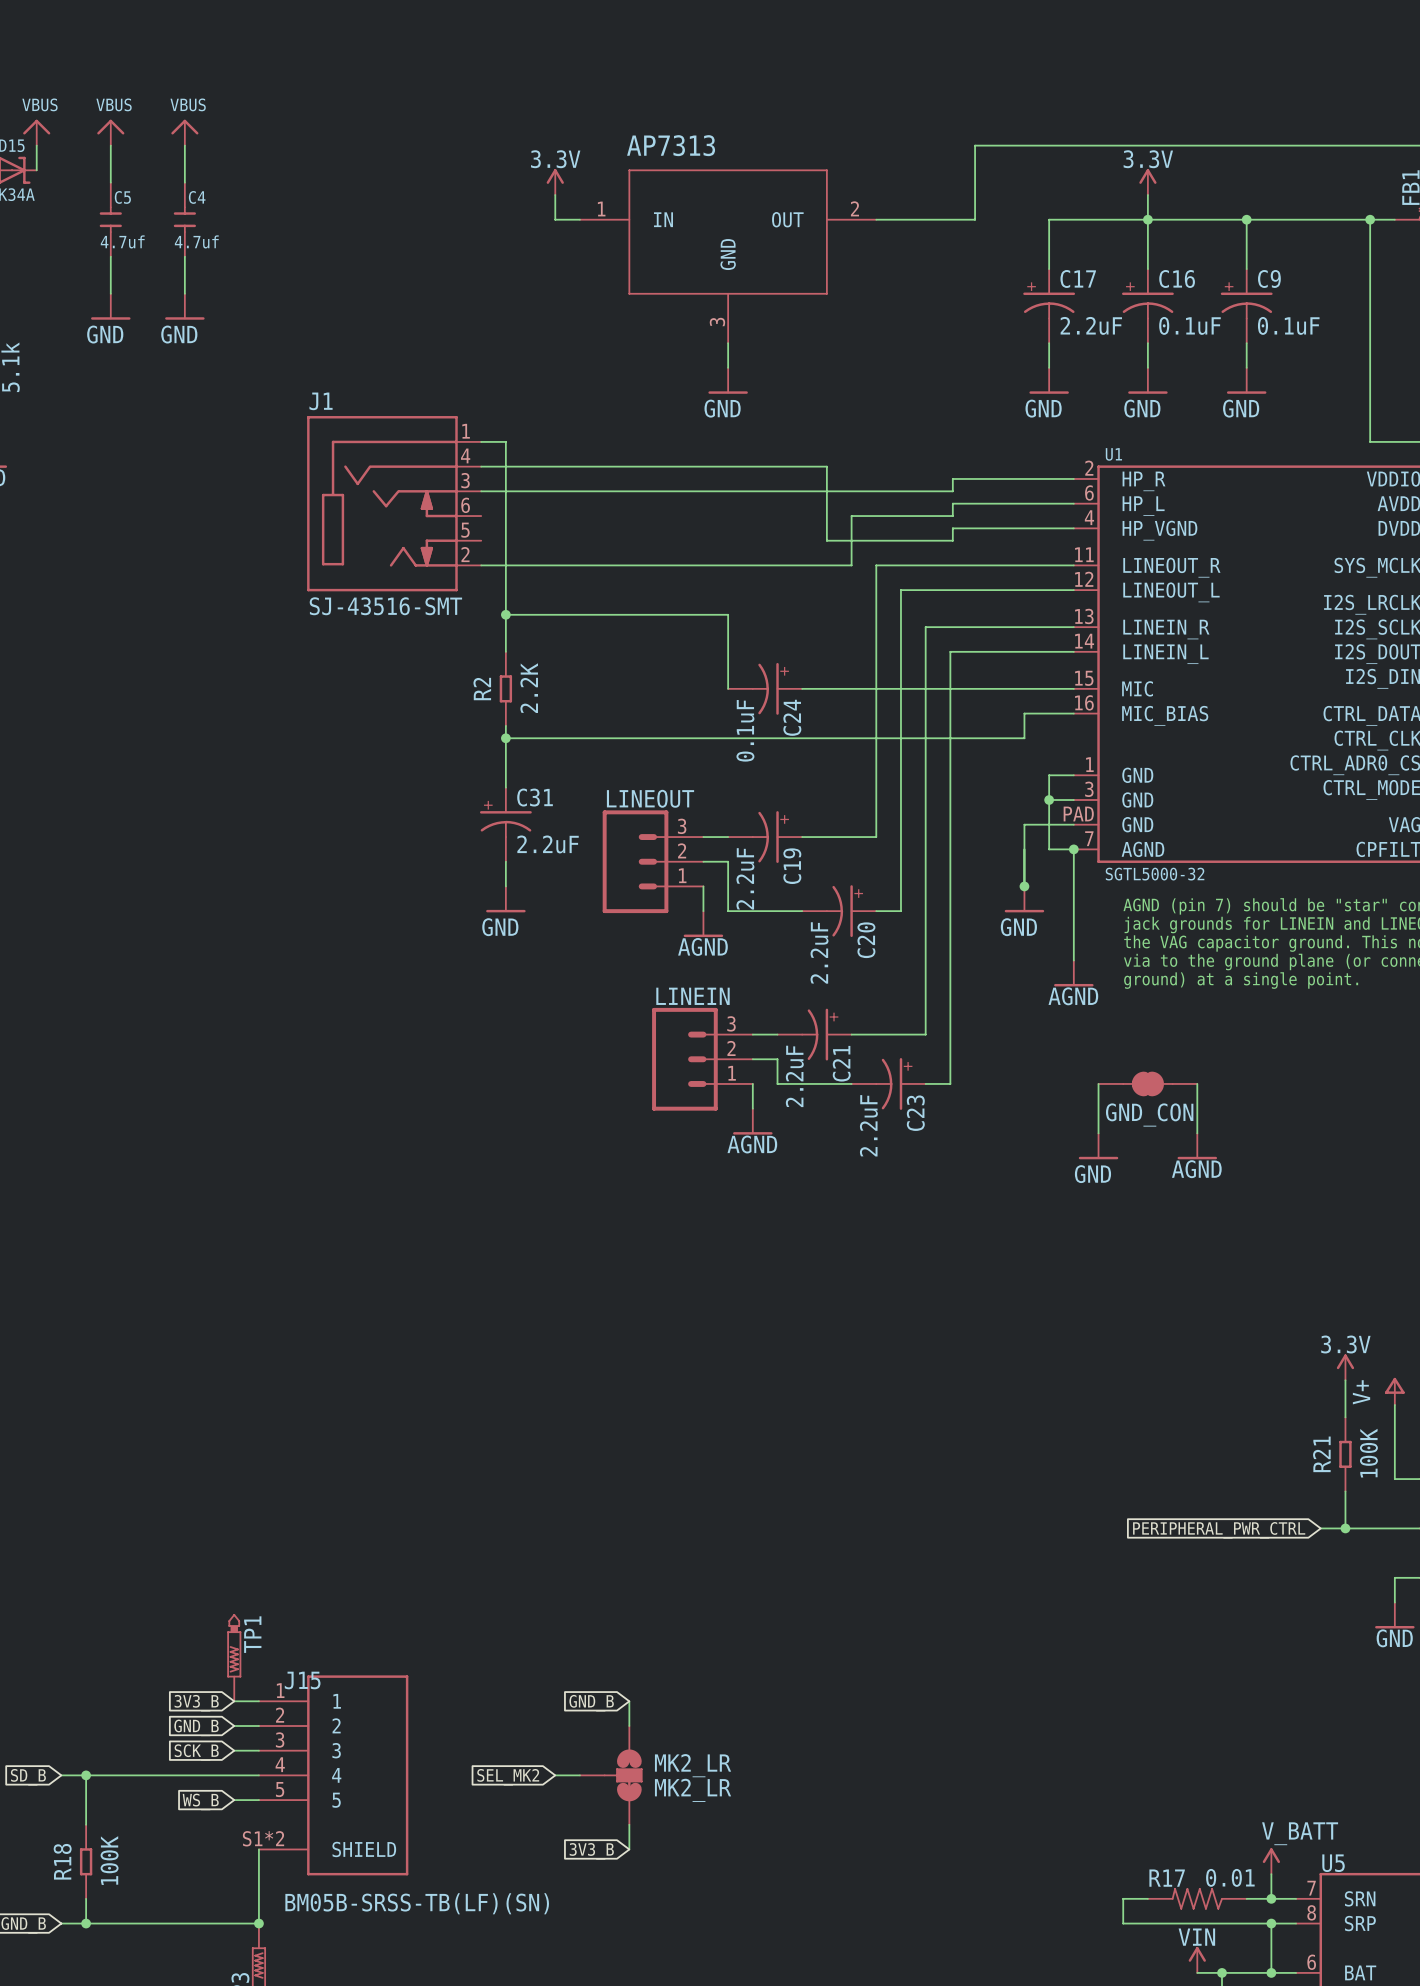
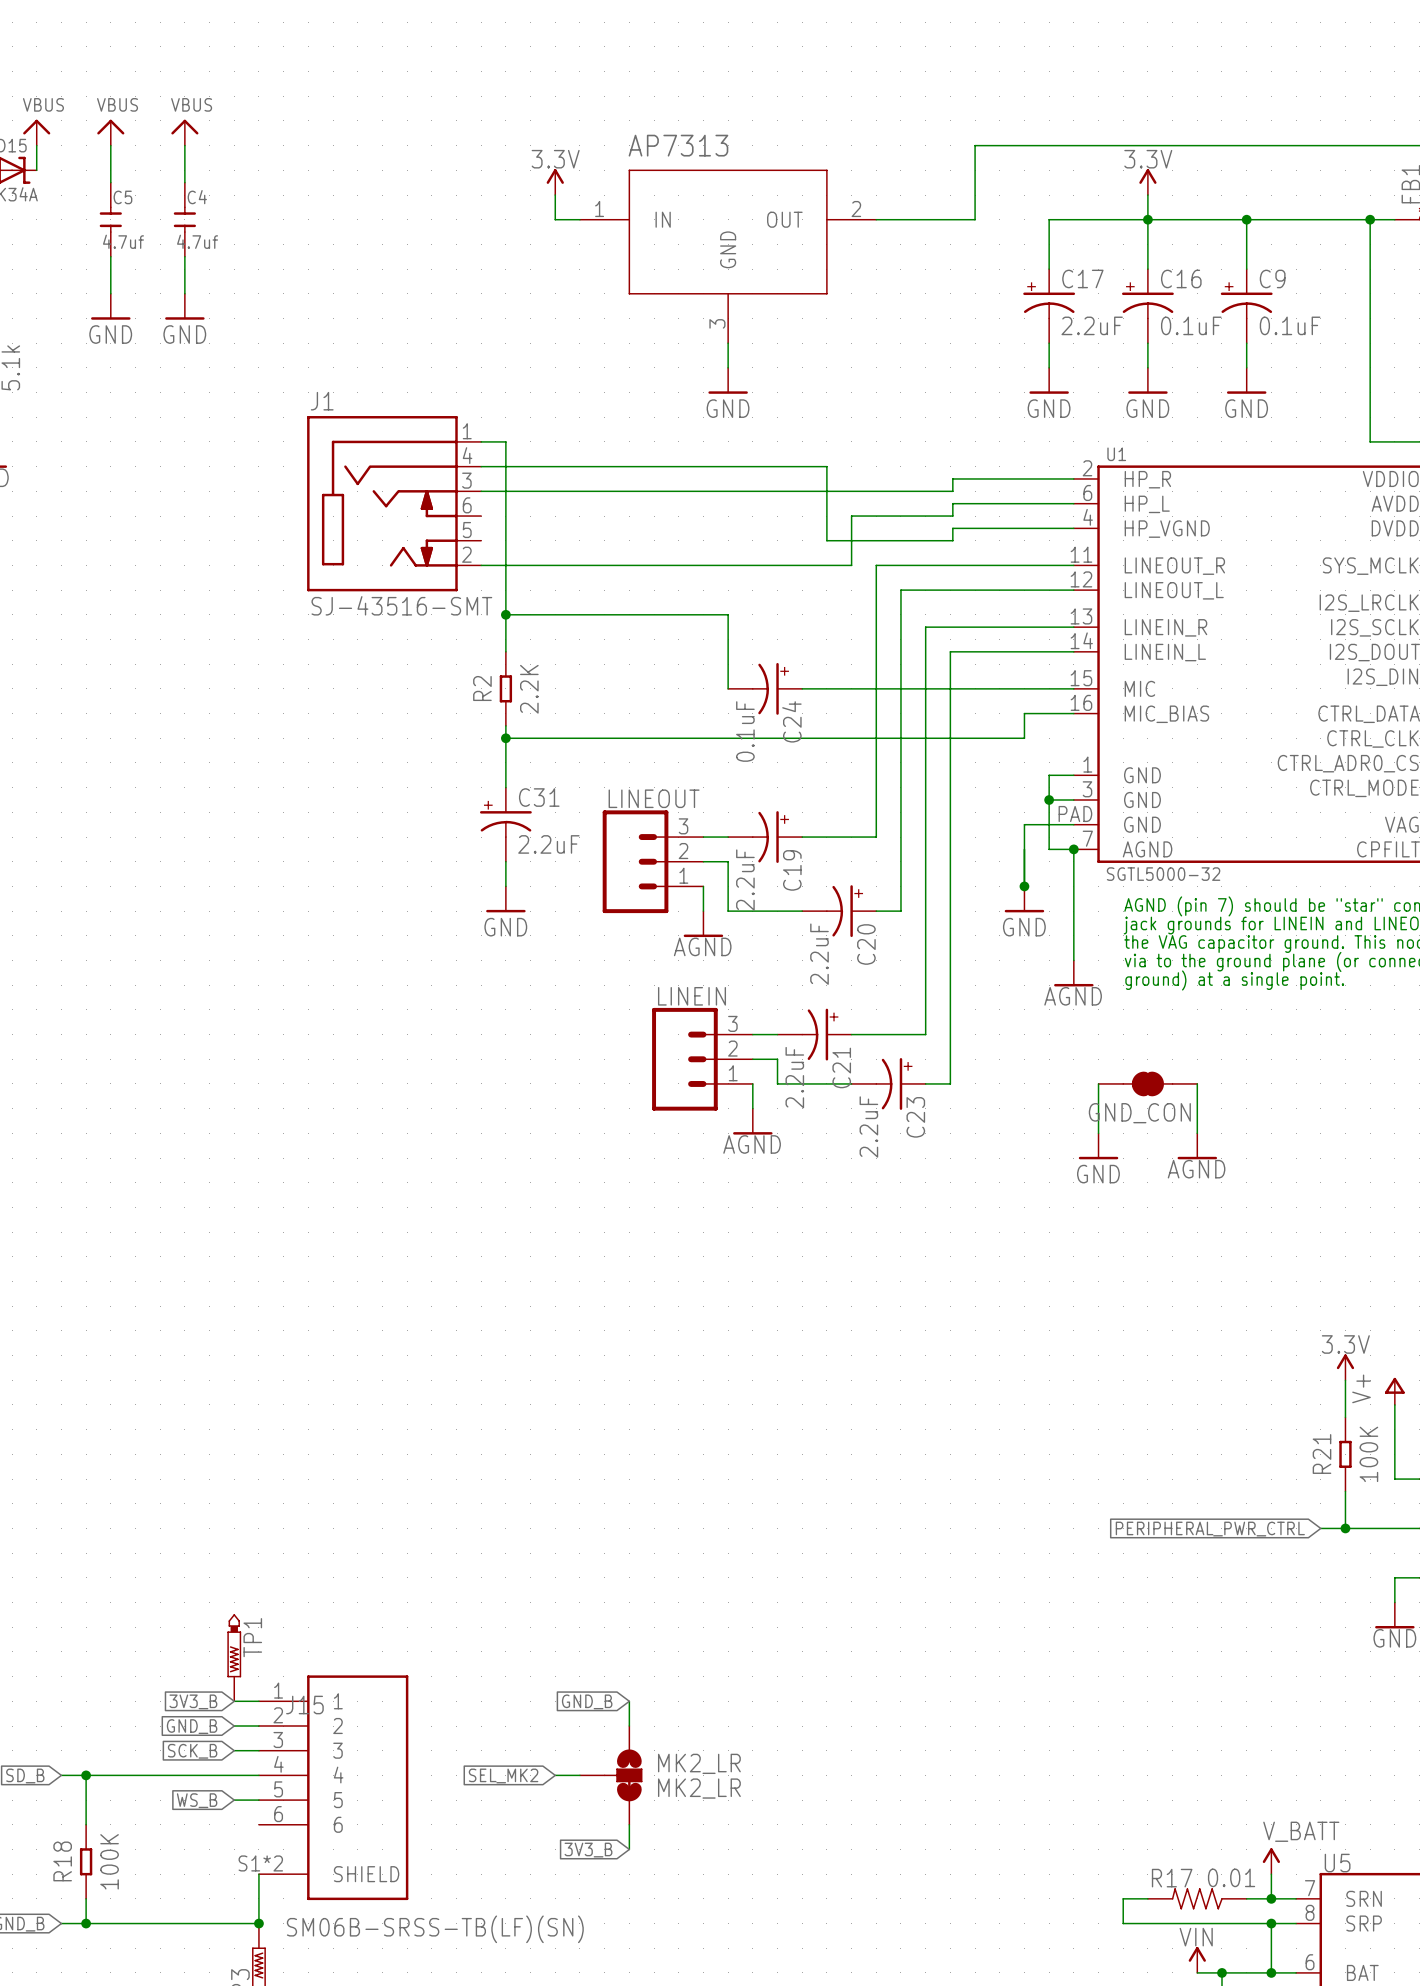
J15 symbol: [258, 1675, 409, 1876] -> [258, 1675, 409, 1901]
wire: (258, 1849) (258, 1874) -> none
J15 value: BM05B-SRSS-TB(LF)(SN) (417, 1903) -> SM06B-SRSS-TB(LF)(SN) (435, 1929)

